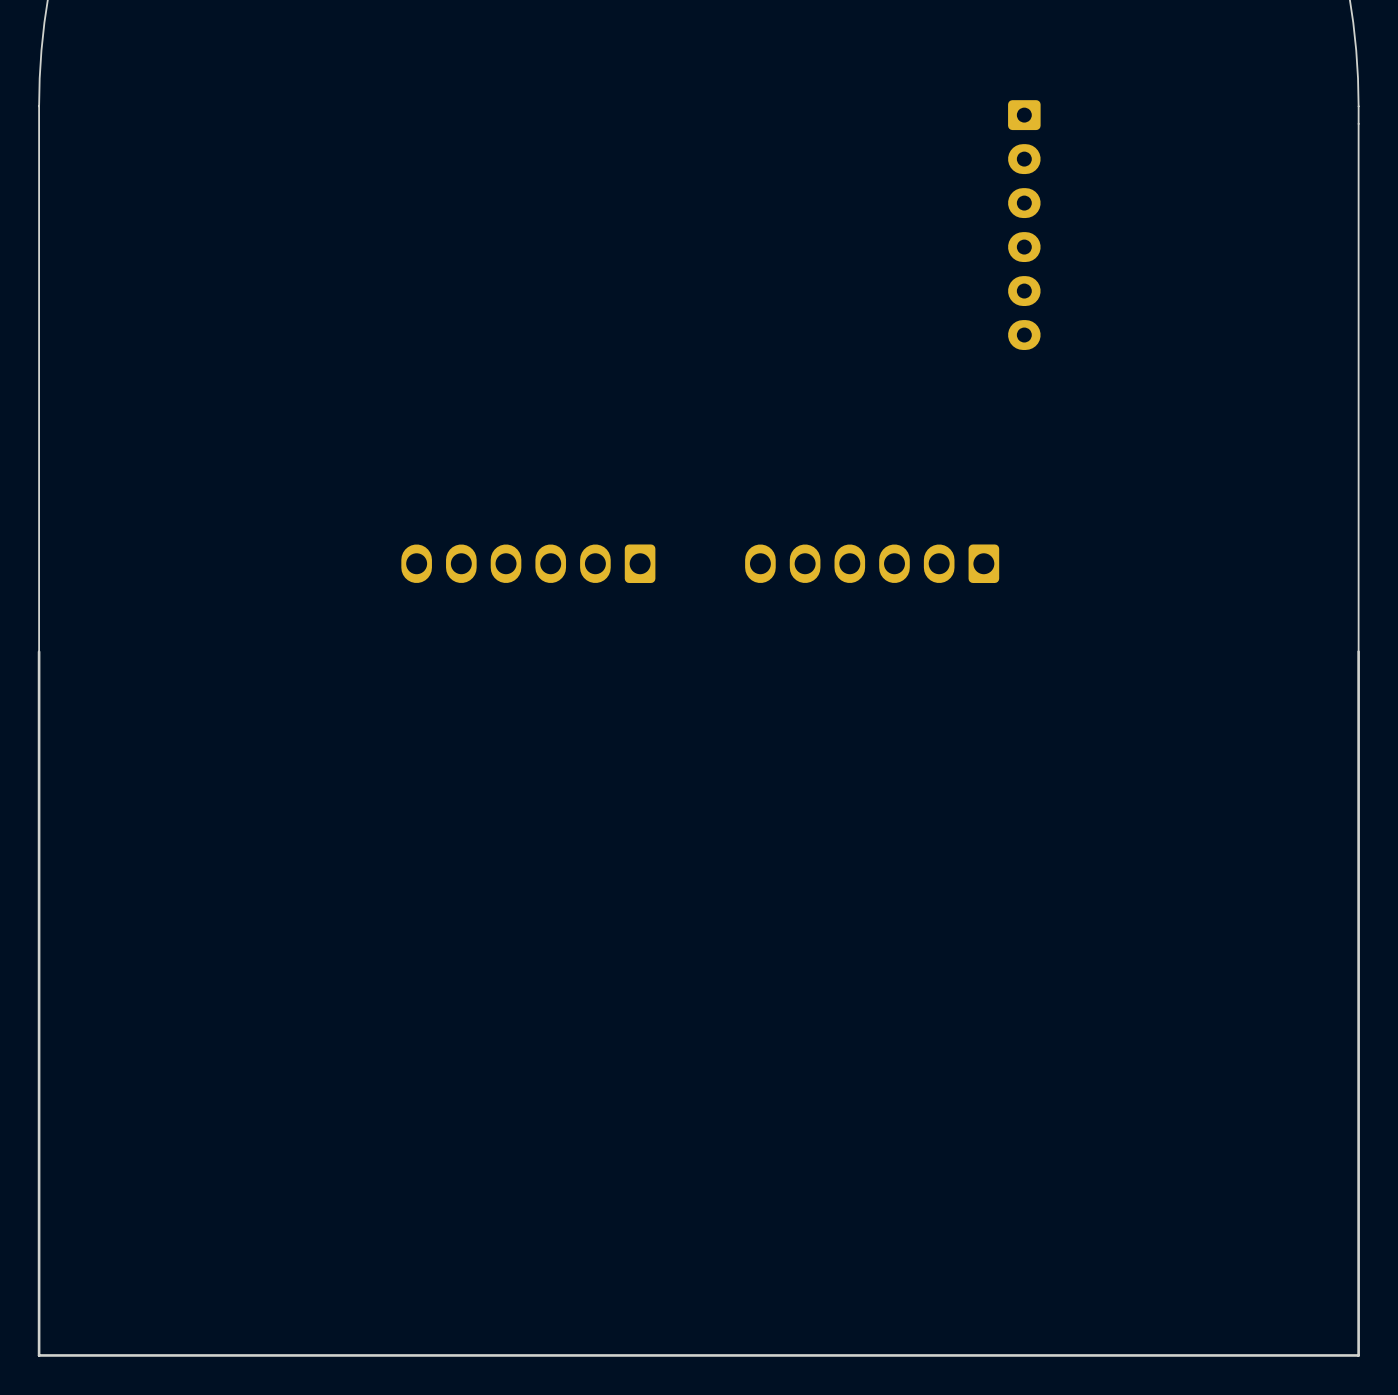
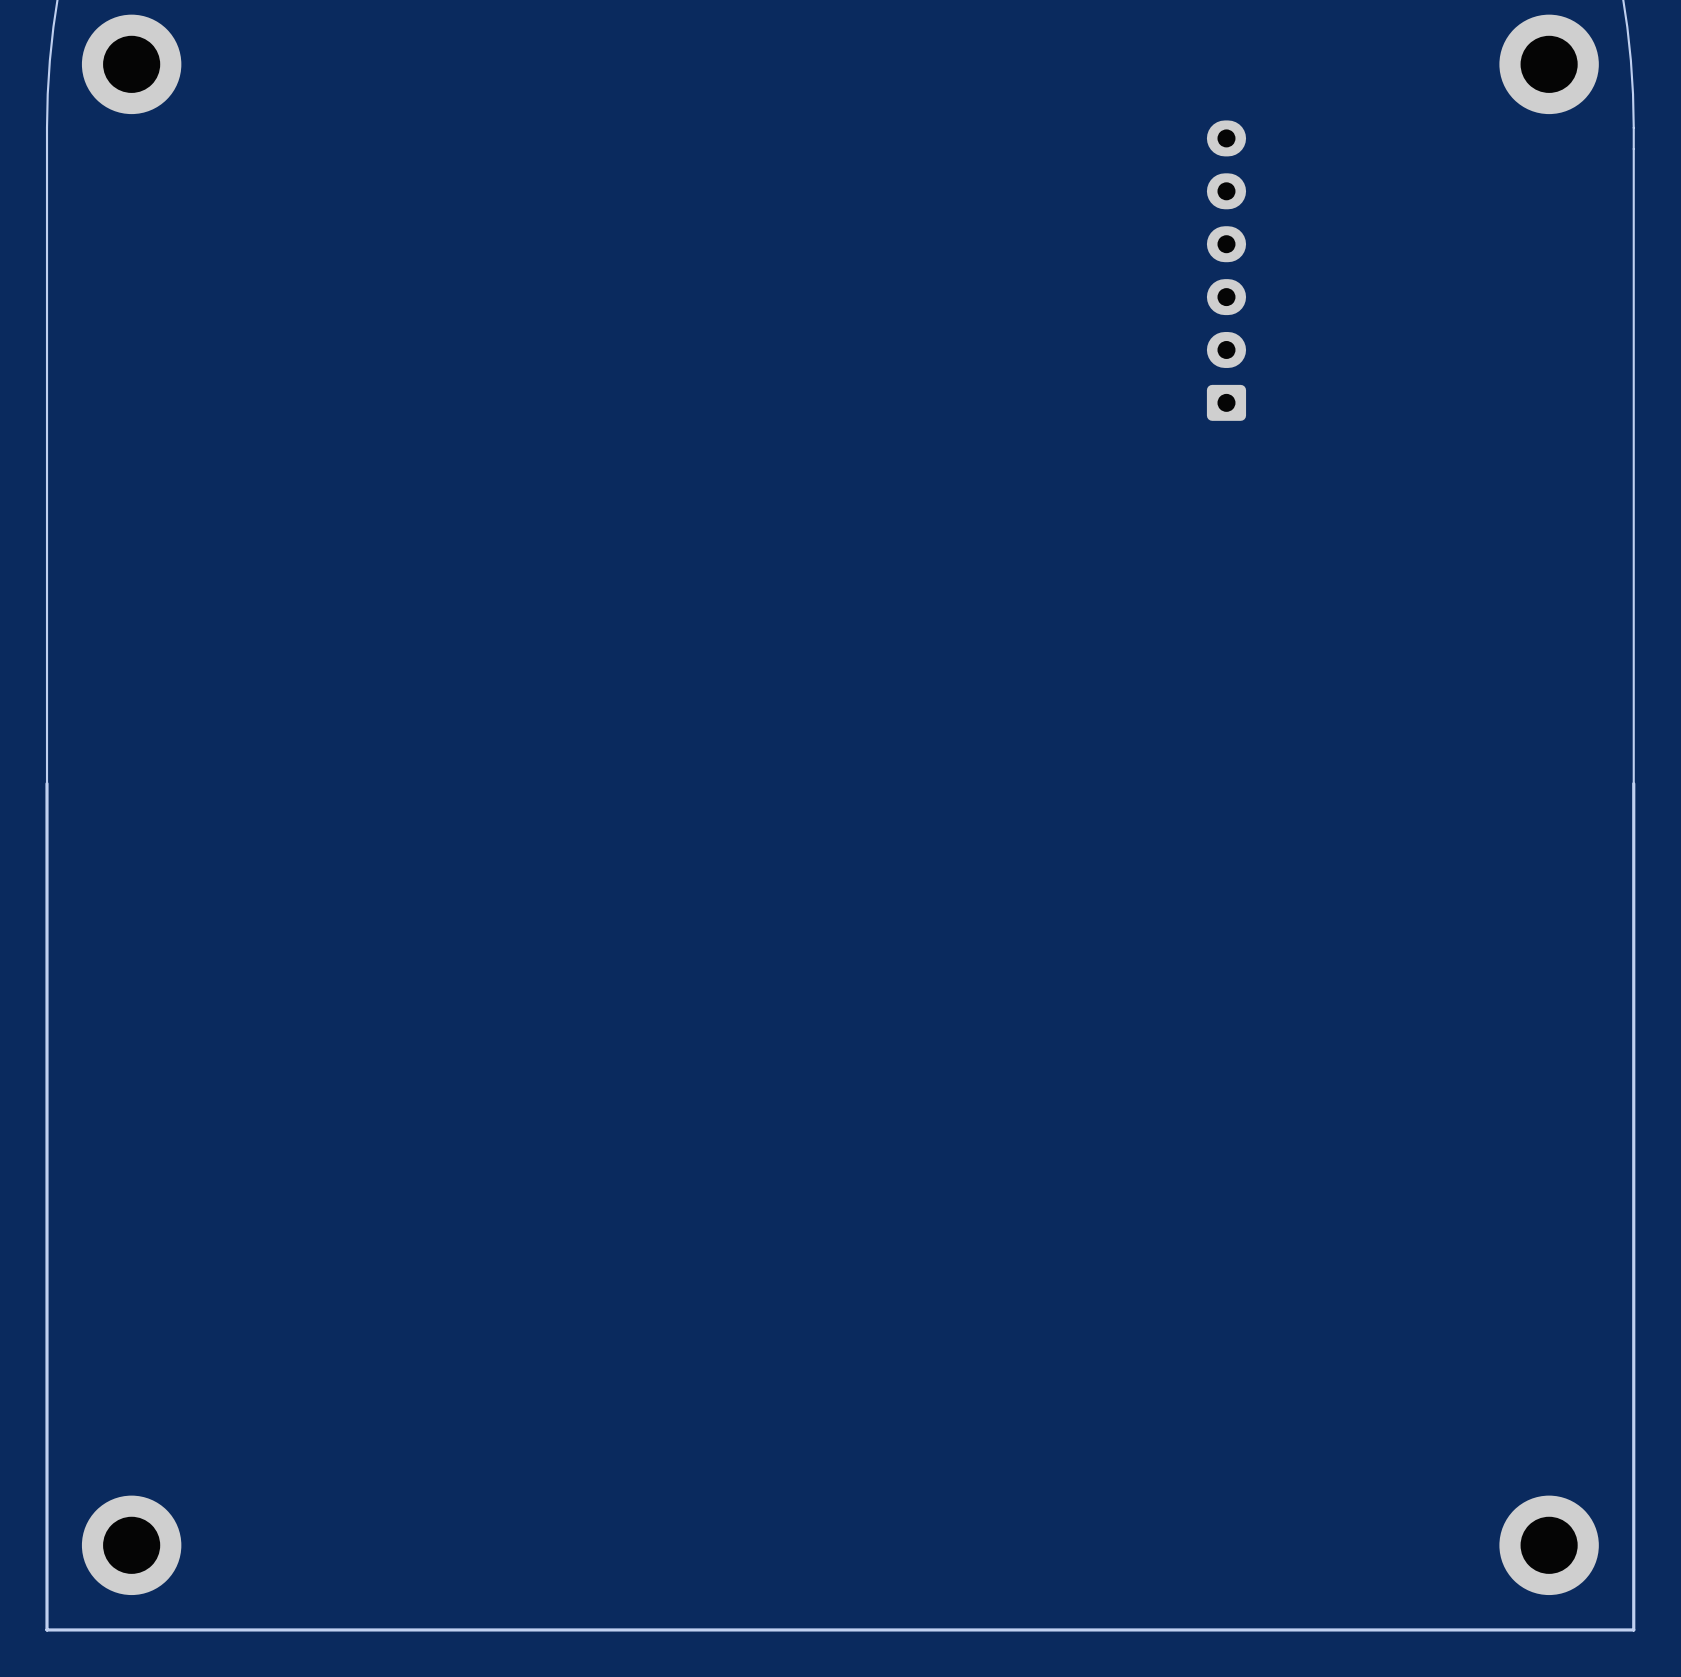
part: none -> (131, 64)
part: none -> (1549, 64)
part rotation: 0° (1024, 225) -> 180° (1226, 270)
part: (528, 563) -> none
part: (872, 563) -> none
part: none -> (131, 1545)
part: none -> (1549, 1545)

